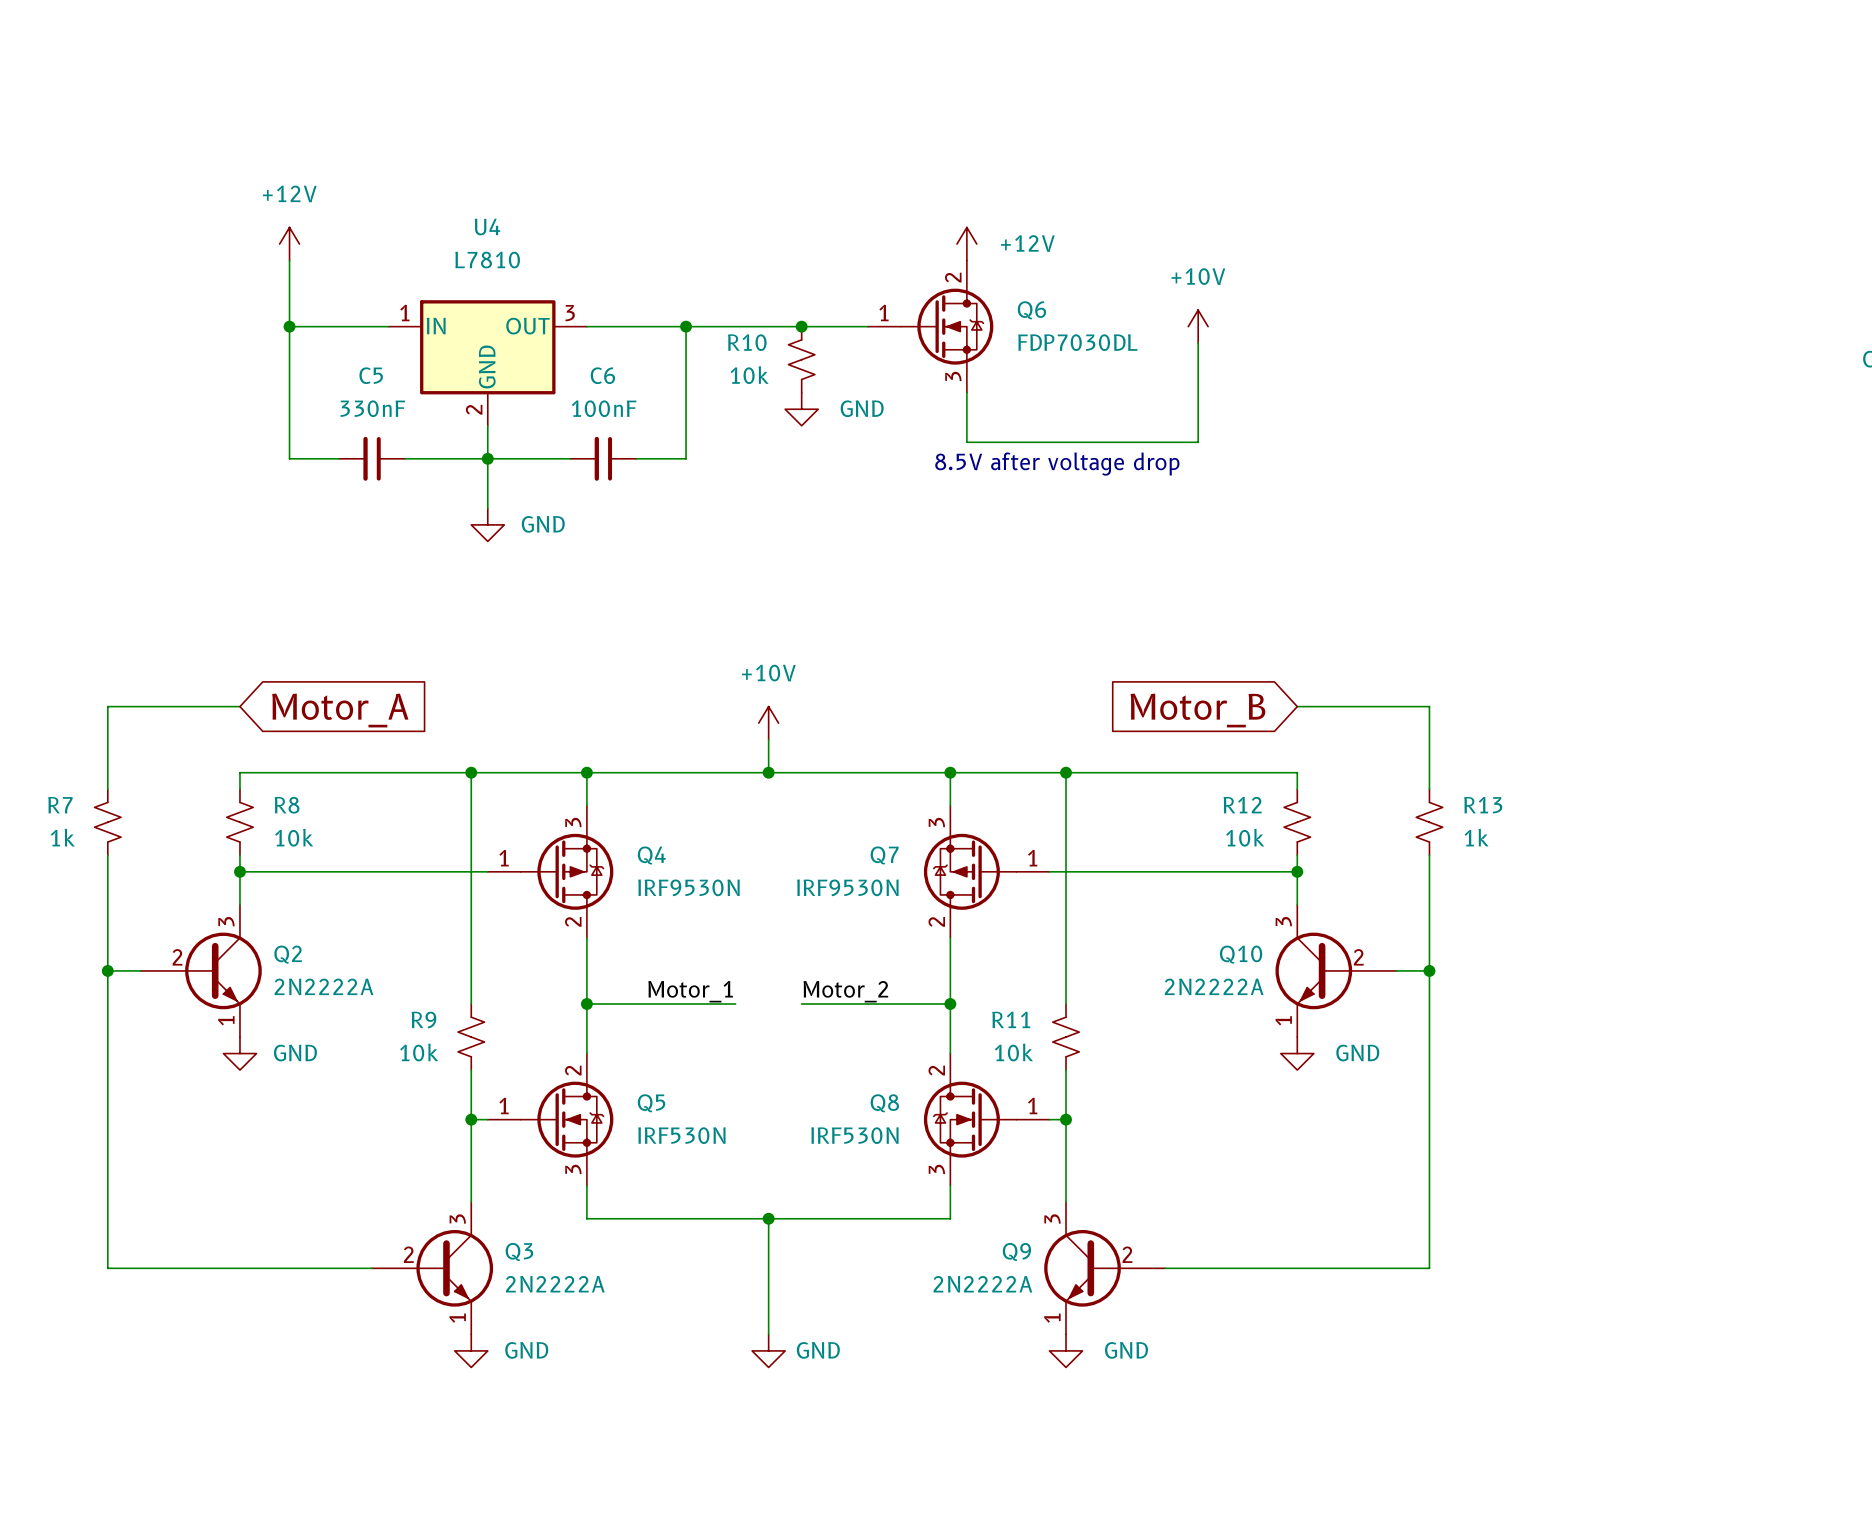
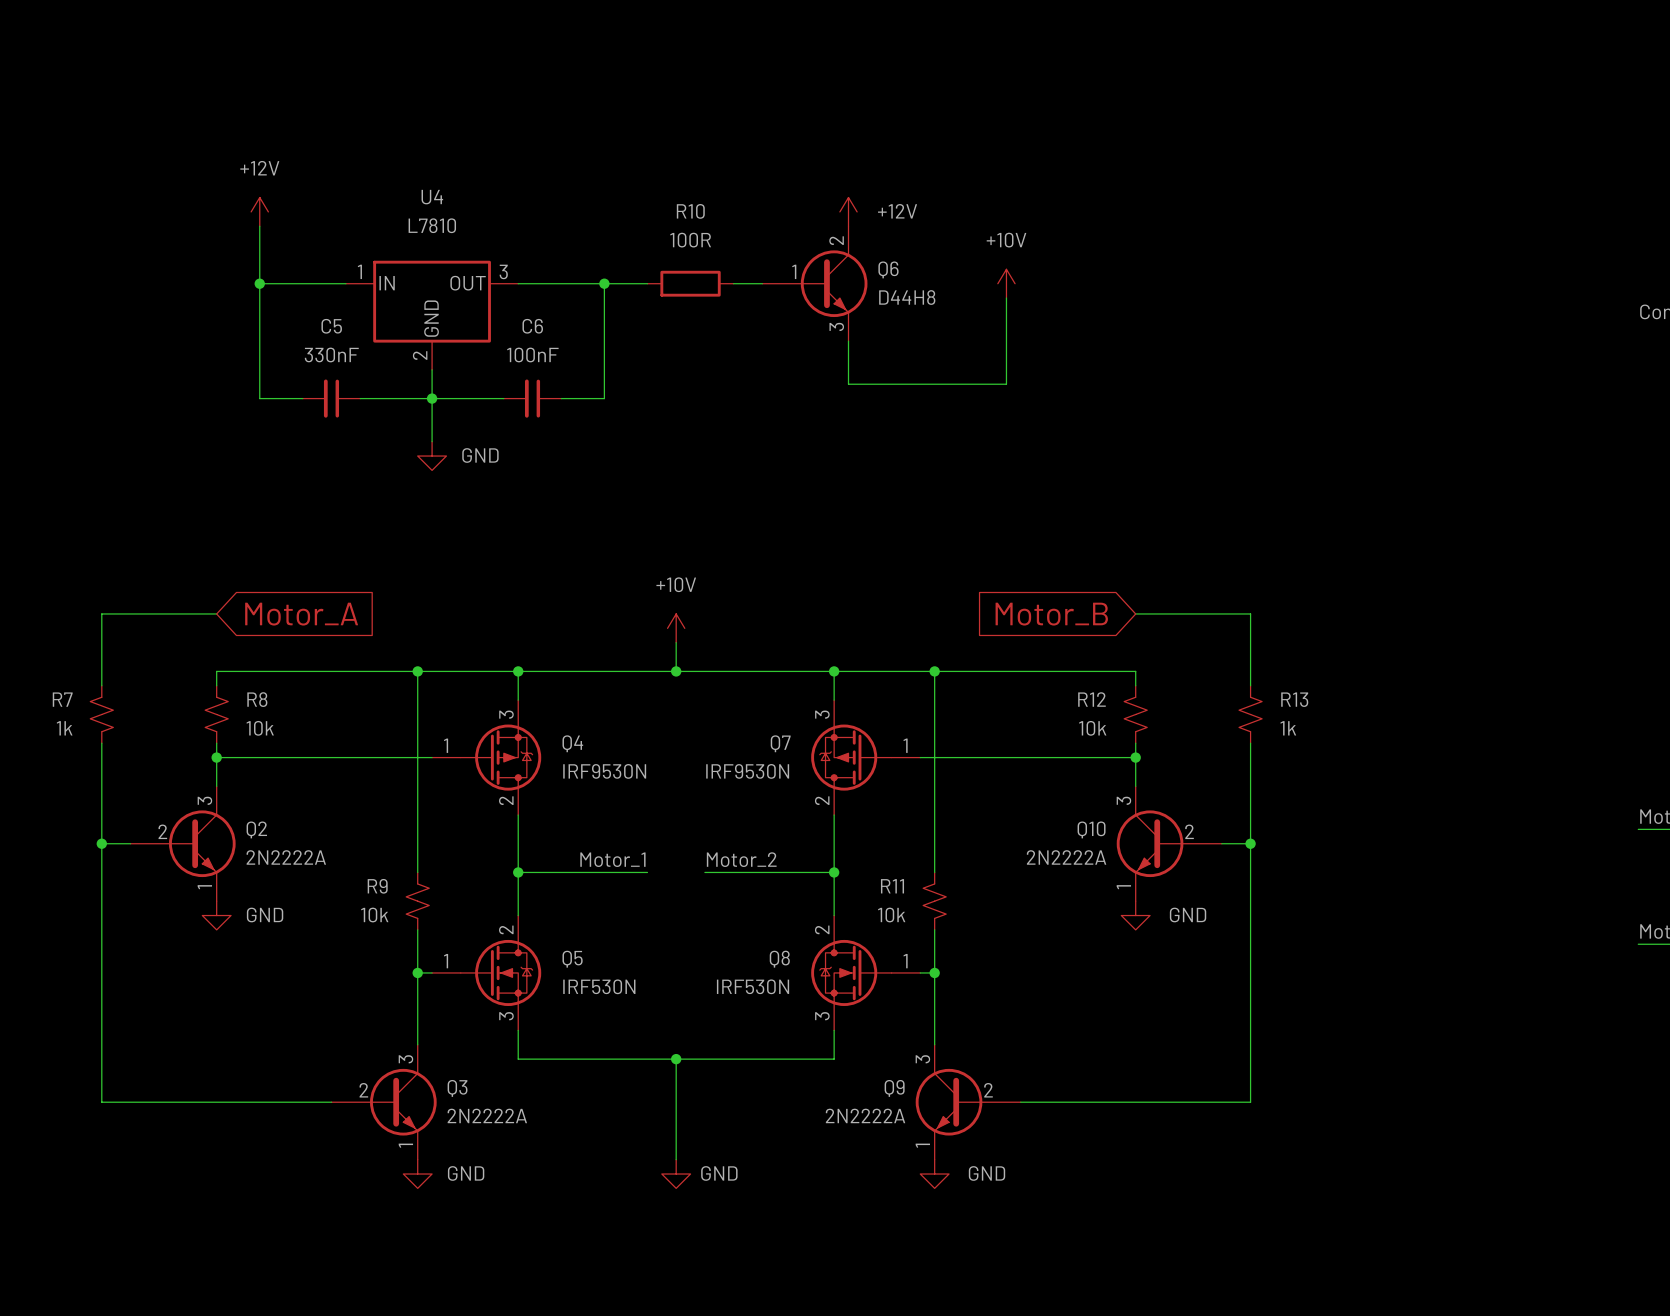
Q6 symbol: [867, 260, 994, 393] -> [762, 226, 868, 342]
wire: (735, 326) (834, 326) -> none
R10 symbol: [788, 326, 815, 393] -> [647, 270, 734, 297]
junction: (801, 326) -> none
power symbol position: +10V (1198, 326) -> +10V (1006, 283)
R10 name position: R10 (747, 342) -> R10 (690, 211)
Q6 value: FDP7030DL (1077, 342) -> D44H8 (907, 297)
wire: (1198, 343) (1198, 442) (1148, 442) -> (1006, 298) (1006, 384)
R10 value: 10k (749, 375) -> 100R (690, 240)
power symbol: GND (801, 409) -> none
text: 8.5V after voltage drop (1057, 464) -> none

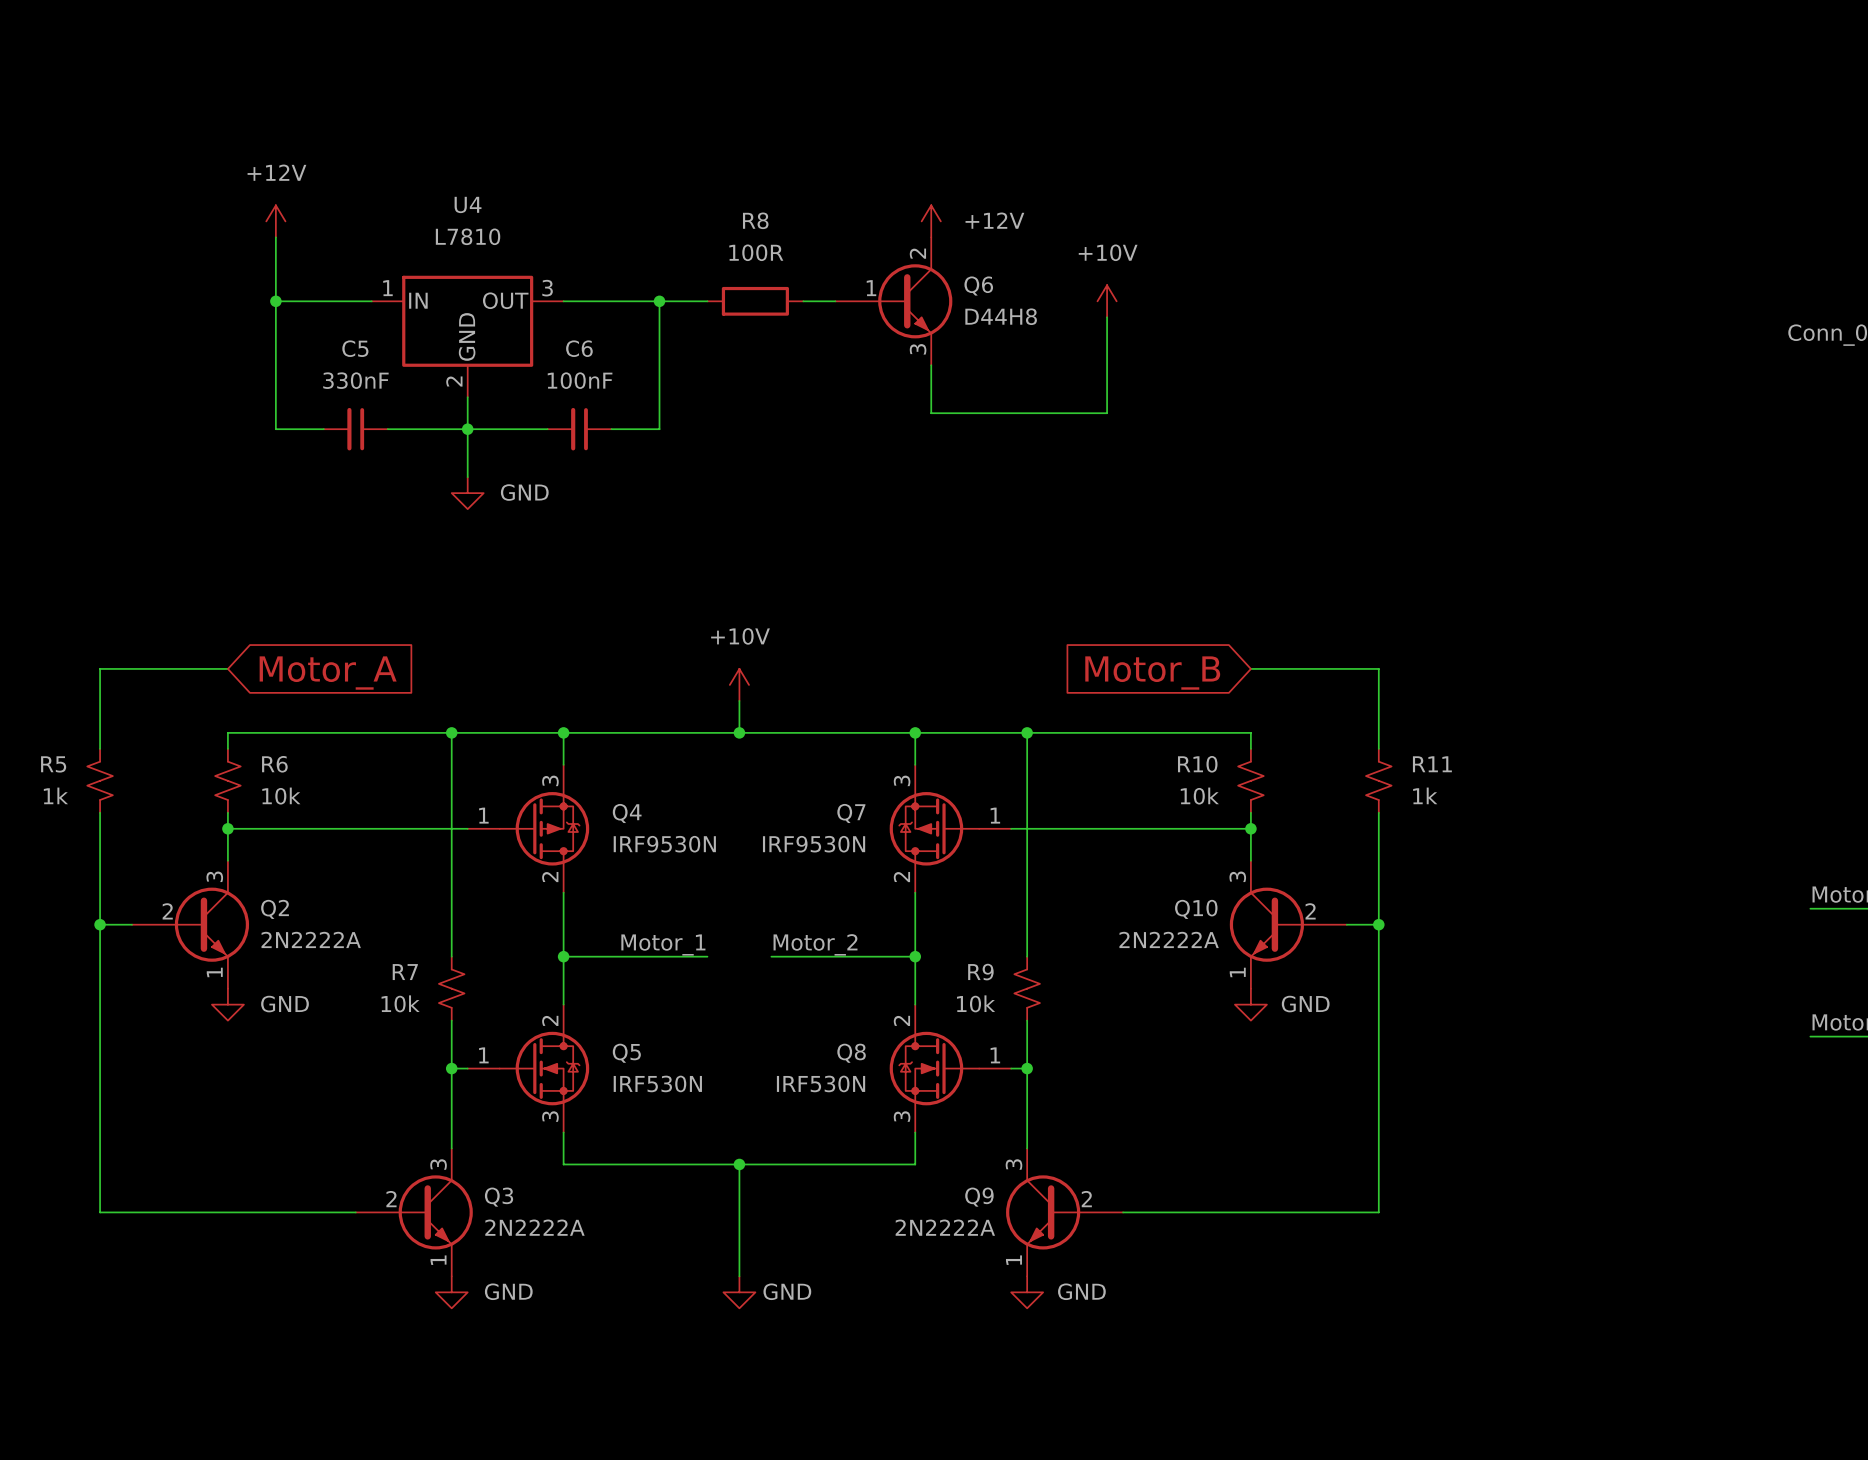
R10 name: R10 (690, 211) -> R8 (755, 220)
R7 name: R7 (62, 699) -> R5 (53, 764)
R8 name: R8 (257, 699) -> R6 (274, 764)
R12 name: R12 (1091, 699) -> R10 (1197, 764)
R13 name: R13 (1294, 699) -> R11 (1432, 764)
R9 name: R9 (377, 886) -> R7 (405, 972)
R11 name: R11 (892, 886) -> R9 (980, 972)

